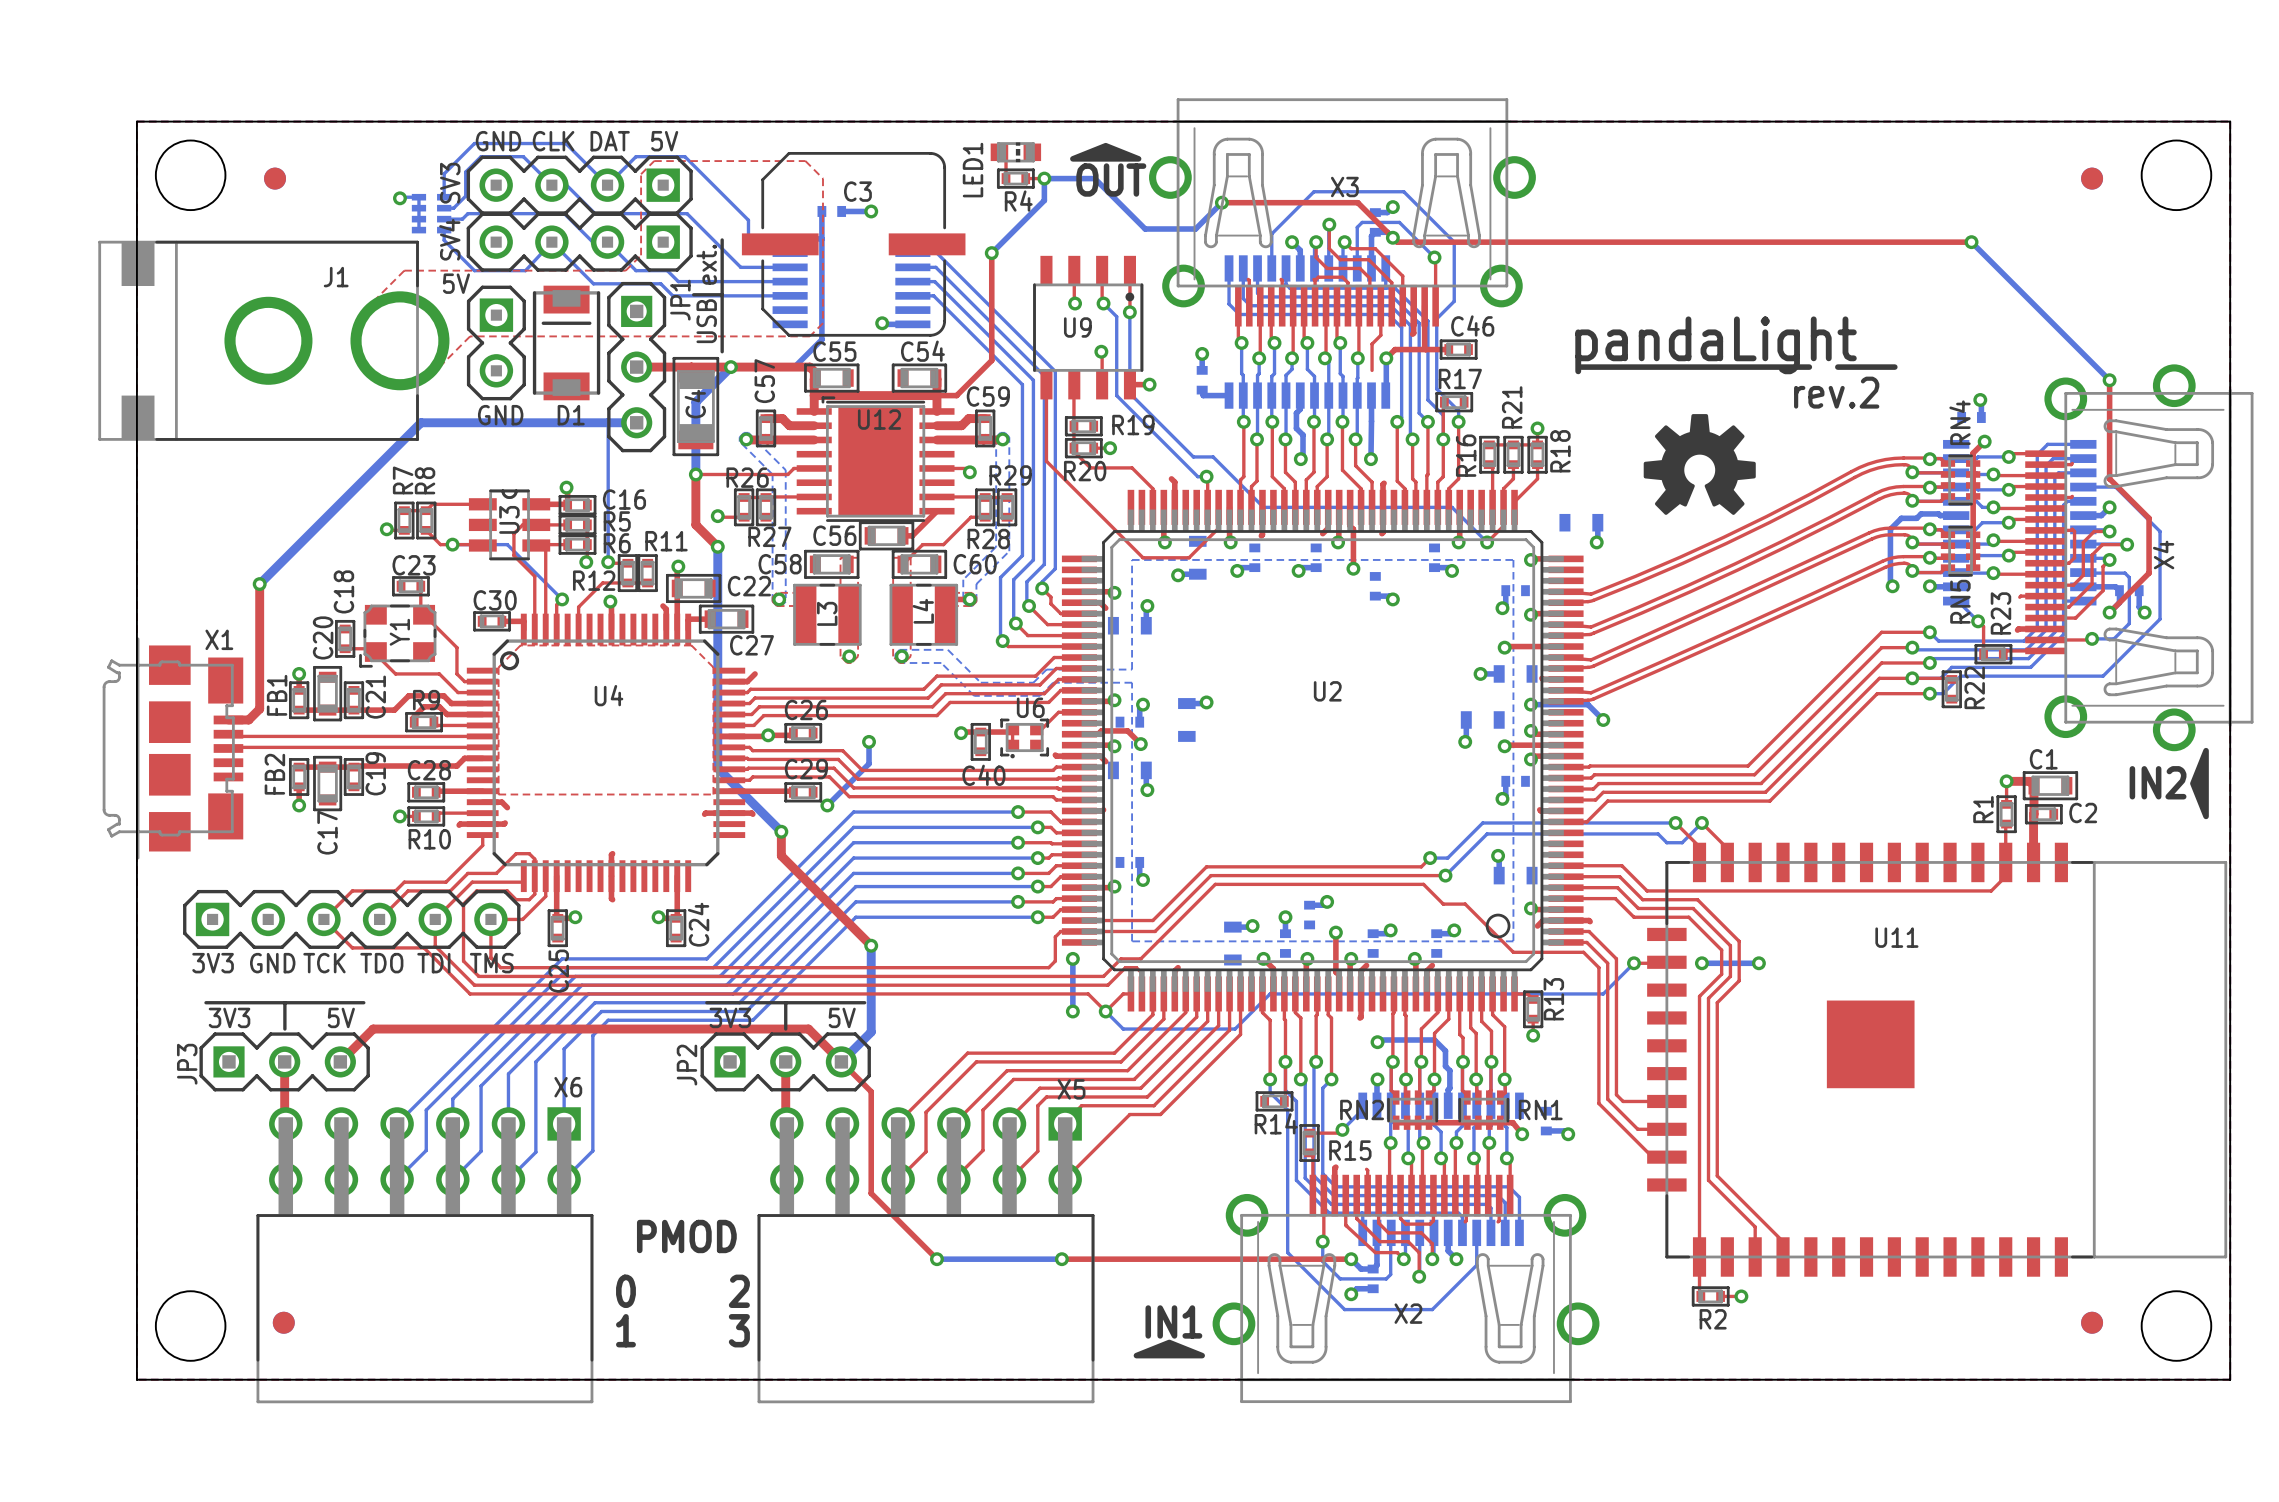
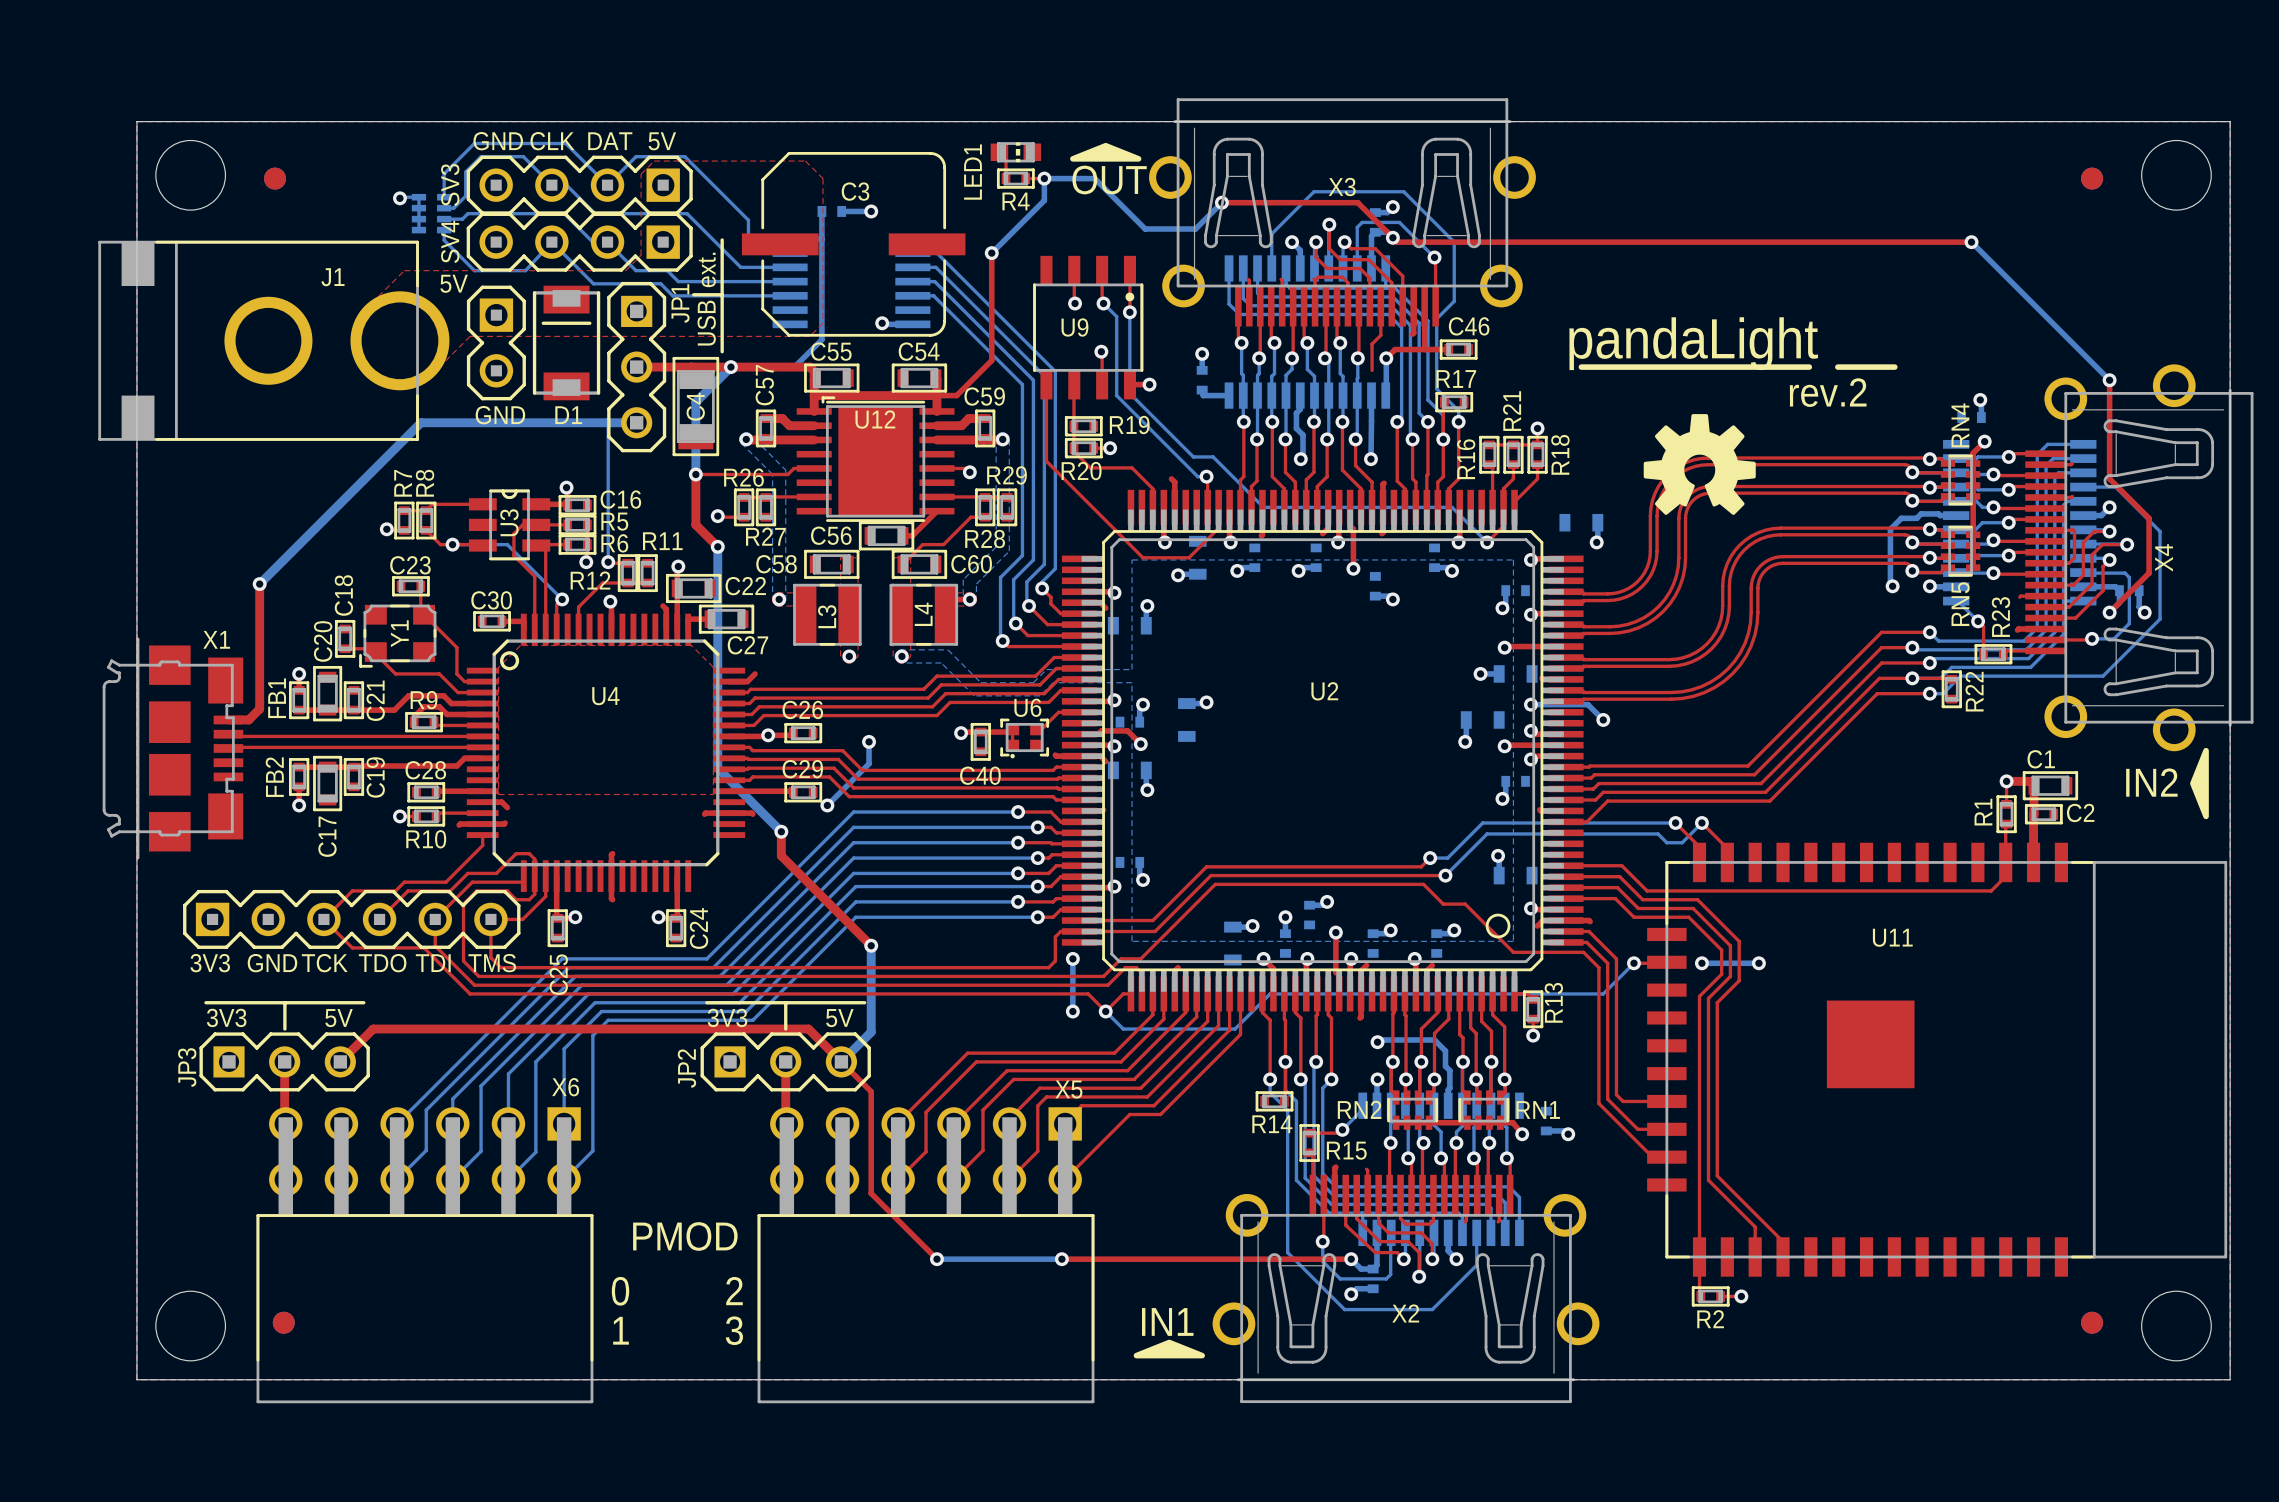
top track: (1903, 458) (1885, 459) (1859, 467) (1723, 537) (1591, 594) (1566, 591) -> (1903, 458) (1708, 458) (1686, 462) (1667, 475) (1654, 493) (1650, 508) (1650, 556) (1647, 567) (1637, 581) (1629, 588) (1613, 593) (1566, 591)
top track: (1903, 464) (1886, 466) (1862, 473) (1769, 522) (1638, 582) (1592, 600) (1566, 602) -> (1903, 464) (1708, 464) (1688, 468) (1672, 479) (1660, 496) (1657, 509) (1655, 563) (1650, 575) (1642, 586) (1632, 593) (1620, 598) (1566, 602)
top track: (1903, 486) (1882, 490) (1735, 563) (1591, 627) (1566, 624) -> (1903, 486) (1710, 486) (1698, 488) (1685, 498) (1679, 510) (1676, 575) (1669, 592) (1658, 606) (1644, 617) (1618, 626) (1583, 626) (1581, 624) (1566, 624)
top track: (1903, 493) (1890, 494) (1878, 499) (1737, 569) (1642, 612) (1590, 634) (1566, 635) -> (1903, 493) (1710, 493) (1701, 495) (1690, 503) (1686, 511) (1685, 557) (1682, 577) (1675, 595) (1663, 611) (1647, 623) (1629, 630) (1566, 635)
top track: (1890, 528) (1869, 532) (1590, 659) (1566, 657) -> (1890, 528) (1780, 528) (1758, 532) (1745, 540) (1730, 557) (1723, 578) (1722, 613) (1718, 626) (1711, 638) (1695, 652) (1682, 657) (1669, 659) (1583, 659) (1581, 657) (1566, 657)
top track: (1890, 534) (1872, 538) (1593, 666) (1566, 668) -> (1890, 534) (1780, 534) (1761, 538) (1744, 549) (1736, 560) (1729, 579) (1728, 613) (1724, 629) (1716, 642) (1699, 658) (1676, 665) (1583, 666) (1581, 668) (1566, 668)
top track: (1903, 556) (1882, 561) (1591, 692) (1566, 690) -> (1903, 556) (1783, 556) (1770, 559) (1760, 565) (1752, 580) (1750, 623) (1745, 643) (1727, 669) (1711, 681) (1691, 689) (1671, 692) (1583, 692) (1581, 690) (1566, 690)
top track: (1903, 563) (1885, 567) (1593, 698) (1566, 701) -> (1903, 563) (1783, 563) (1773, 565) (1765, 570) (1758, 581) (1757, 623) (1751, 645) (1732, 673) (1714, 687) (1682, 698) (1583, 699) (1581, 701) (1566, 701)

